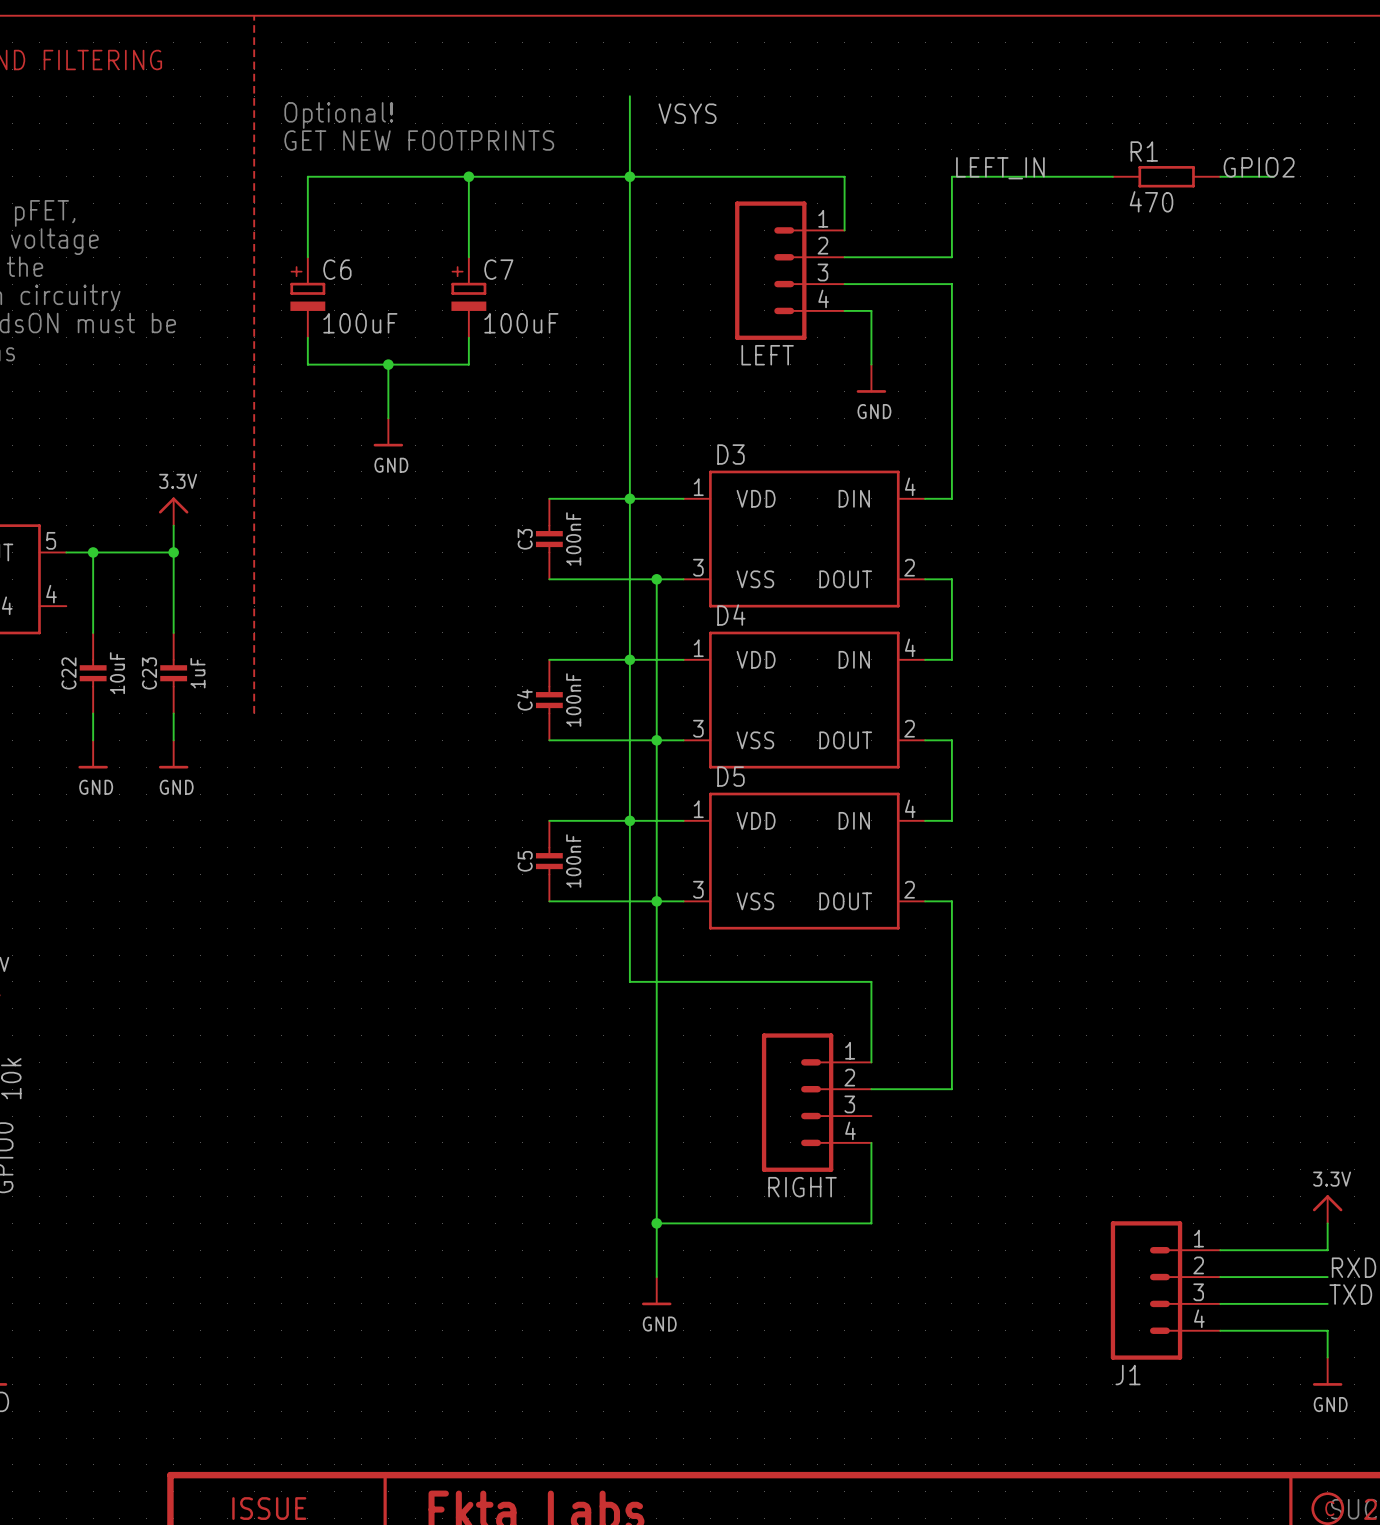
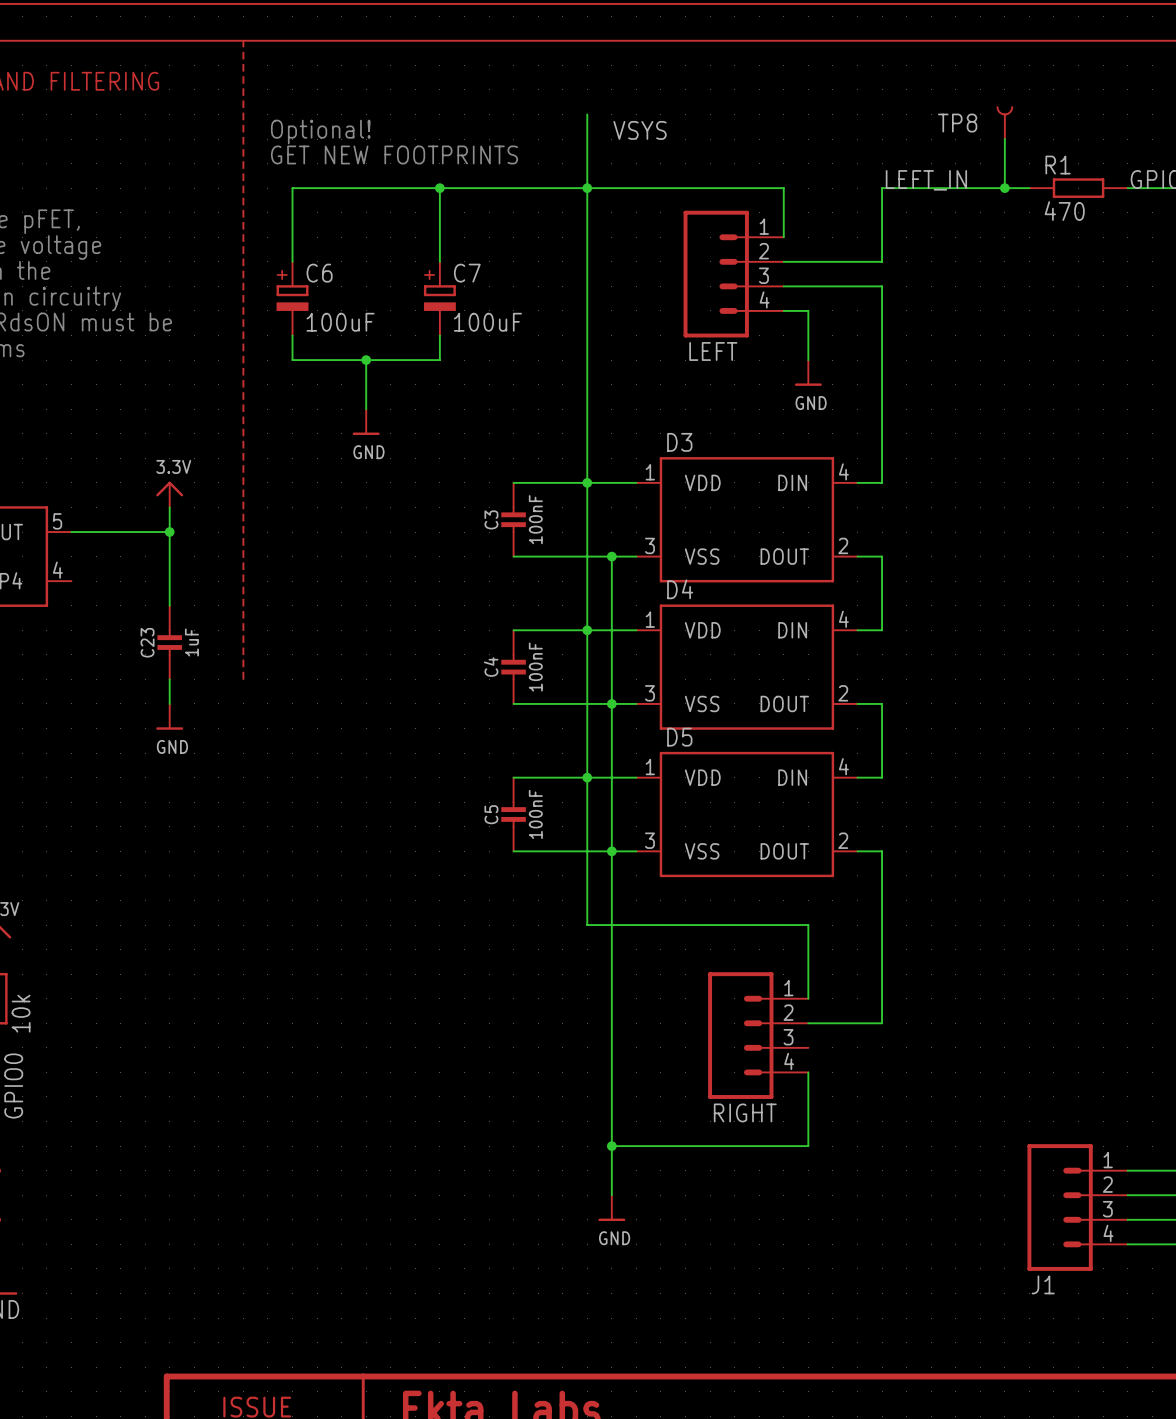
TP8: none -> (1004, 123)
wire: none -> (1004, 139) (1004, 188)
junction: none -> (1004, 188)
wire: (93, 552) (93, 632) -> none
junction: (93, 552) -> none
C22: 10uF (93, 673) -> none
wire: (93, 713) (93, 740) -> none
power symbol: GND (93, 754) -> none

